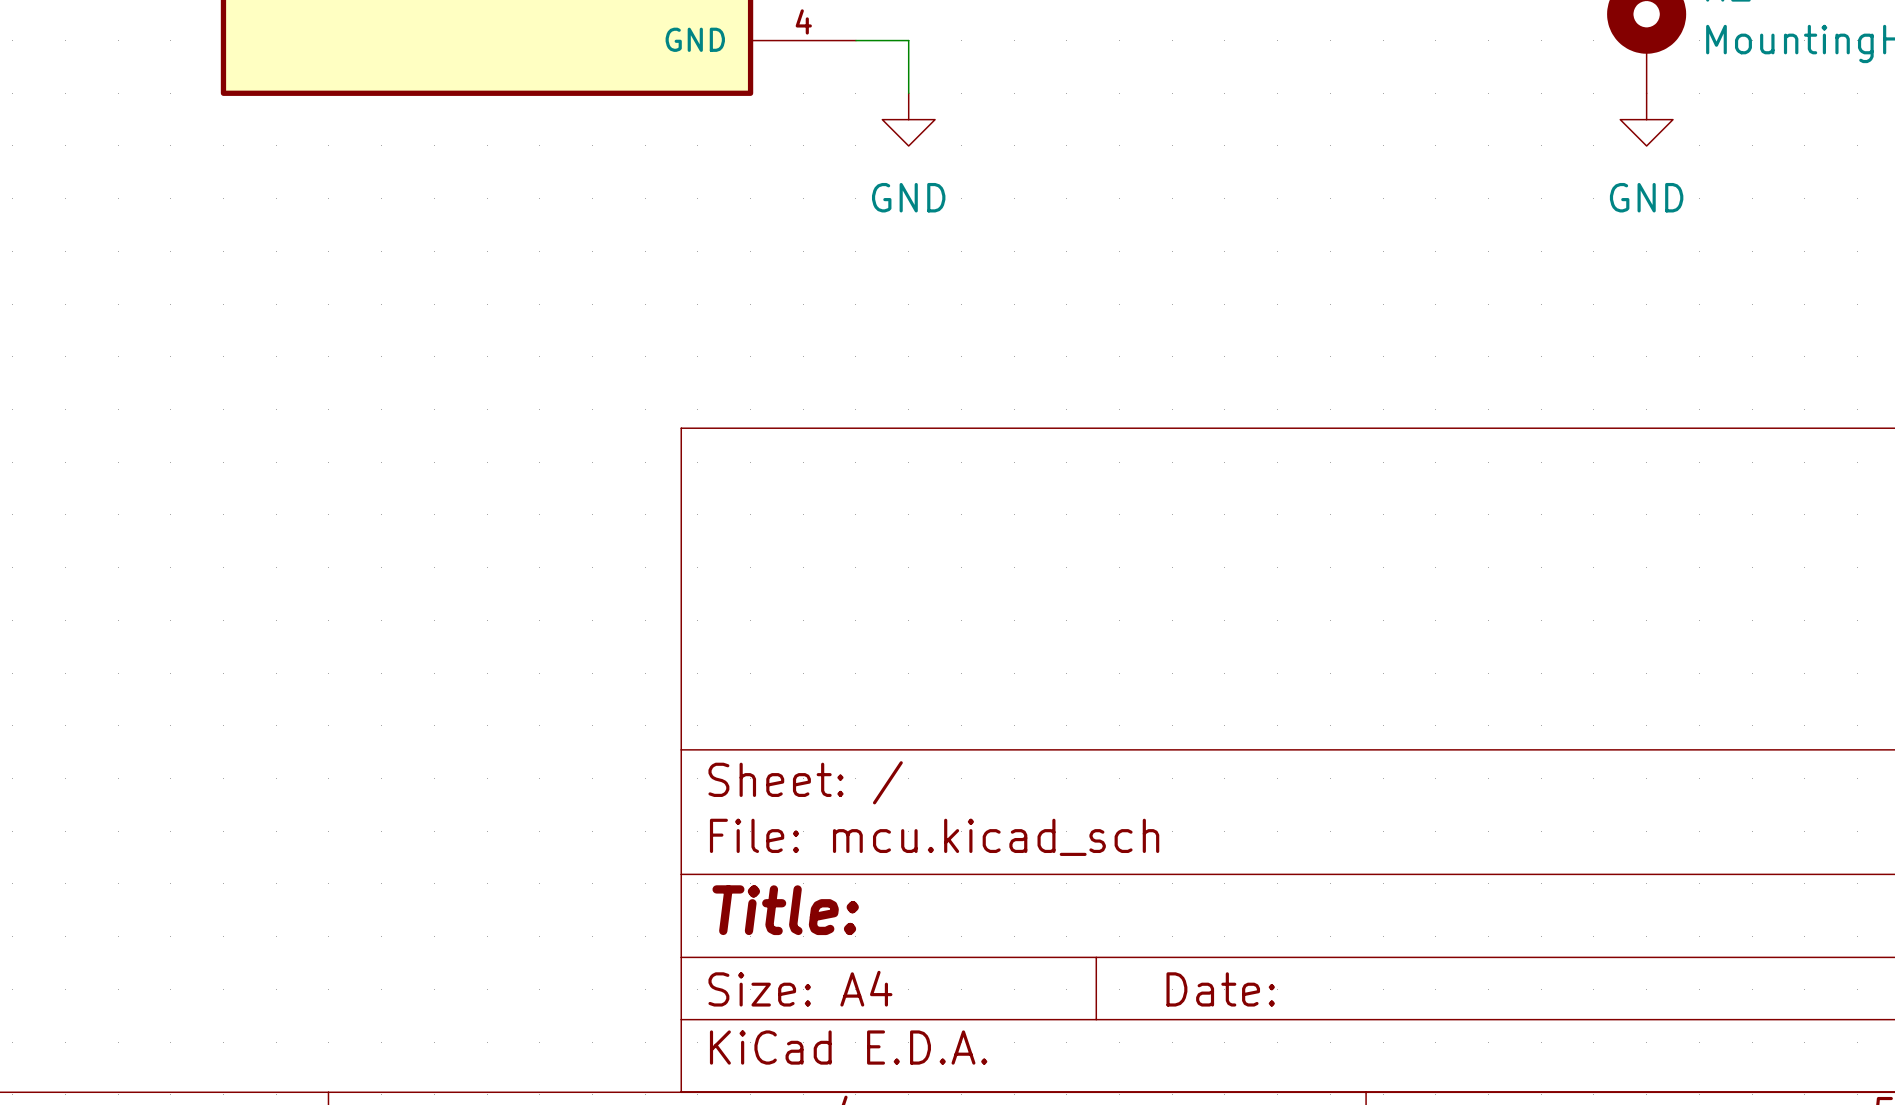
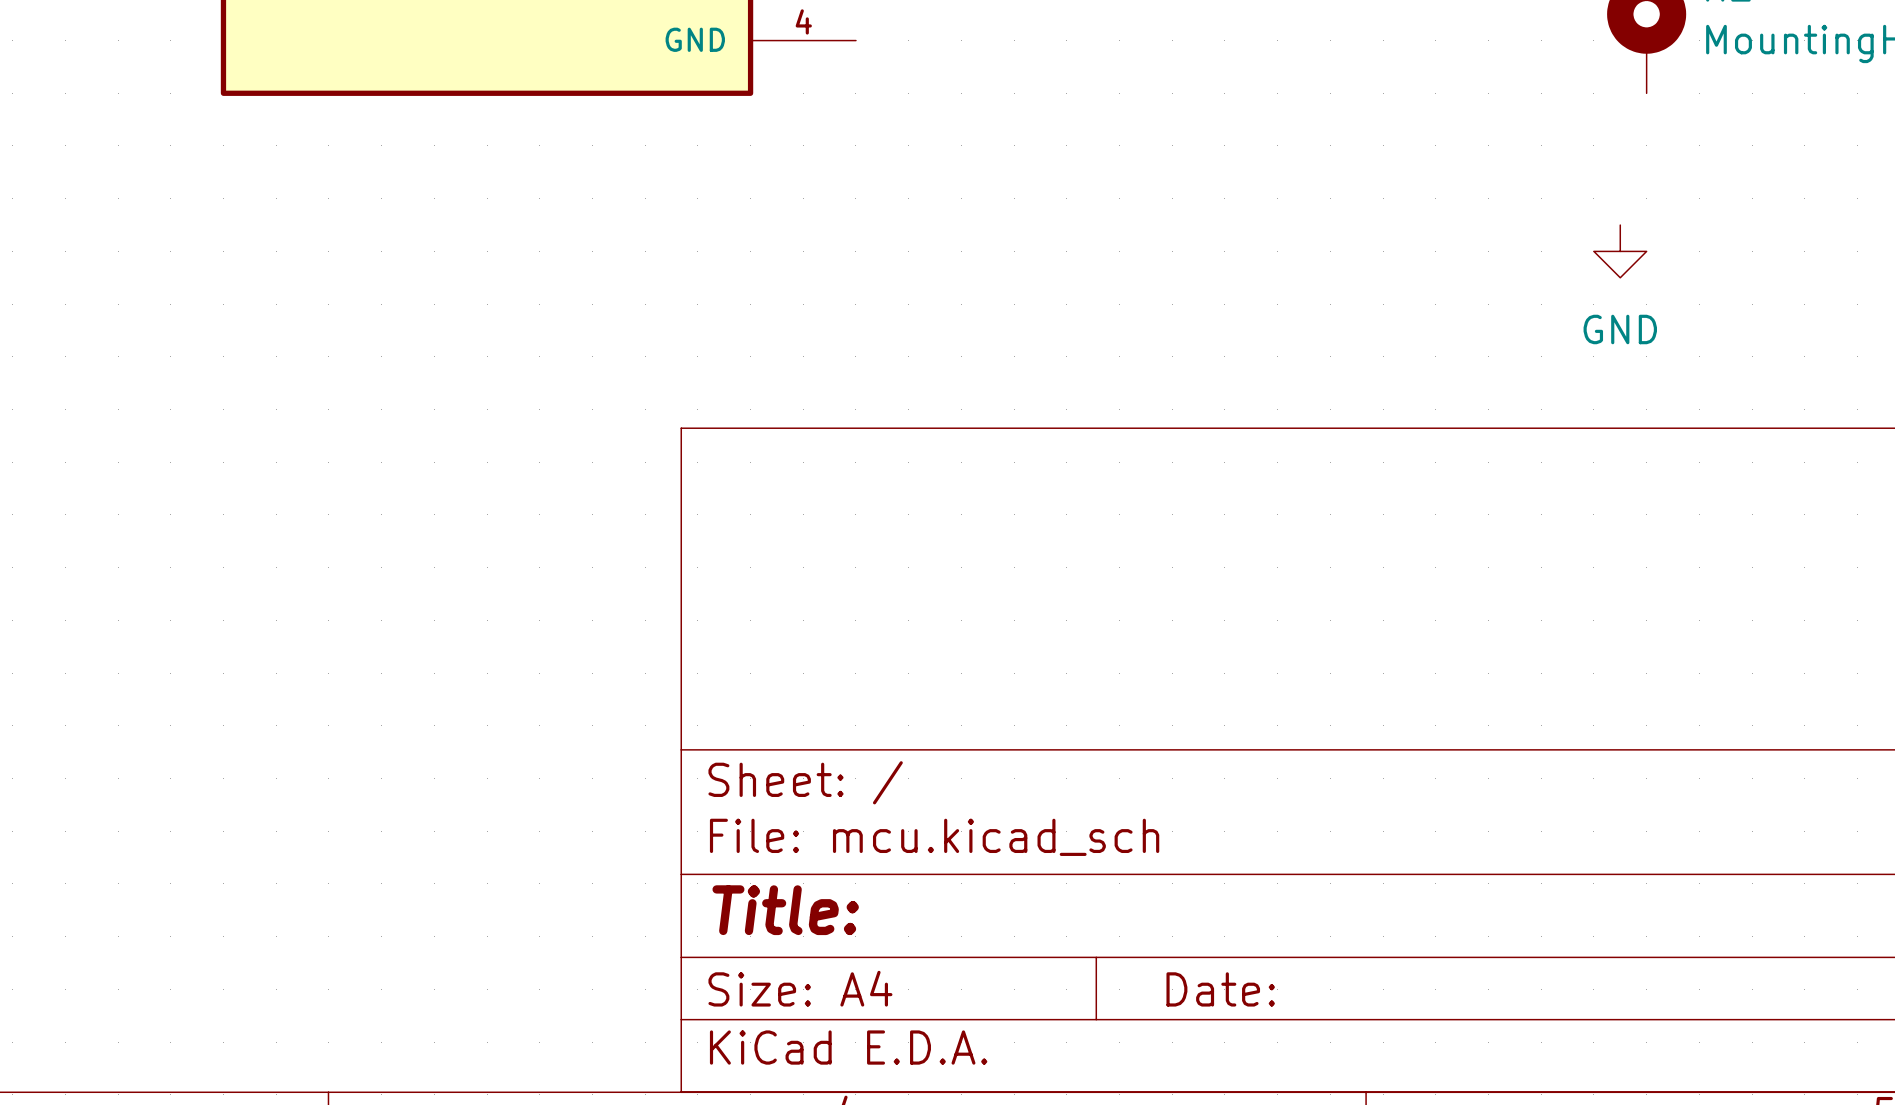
wire: (855, 40) (908, 40) (908, 93) -> none
power symbol: GND (908, 119) -> none
power symbol position: GND (1646, 119) -> GND (1620, 251)

